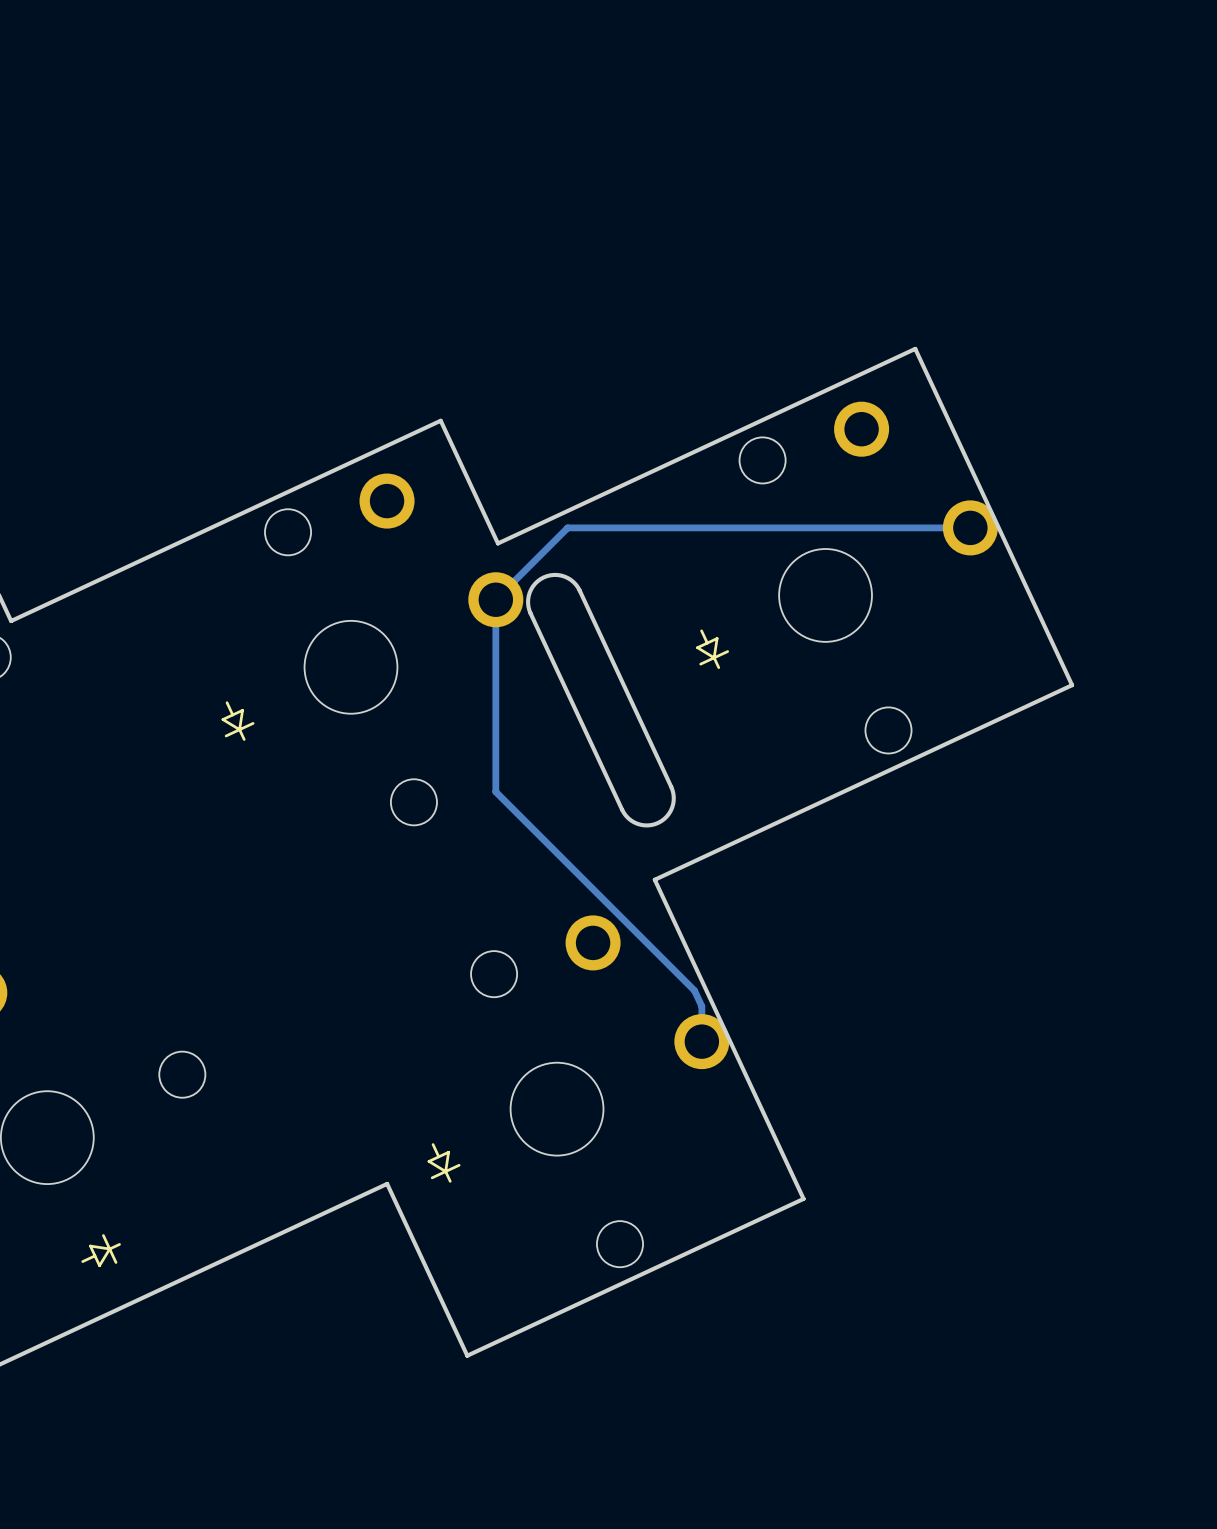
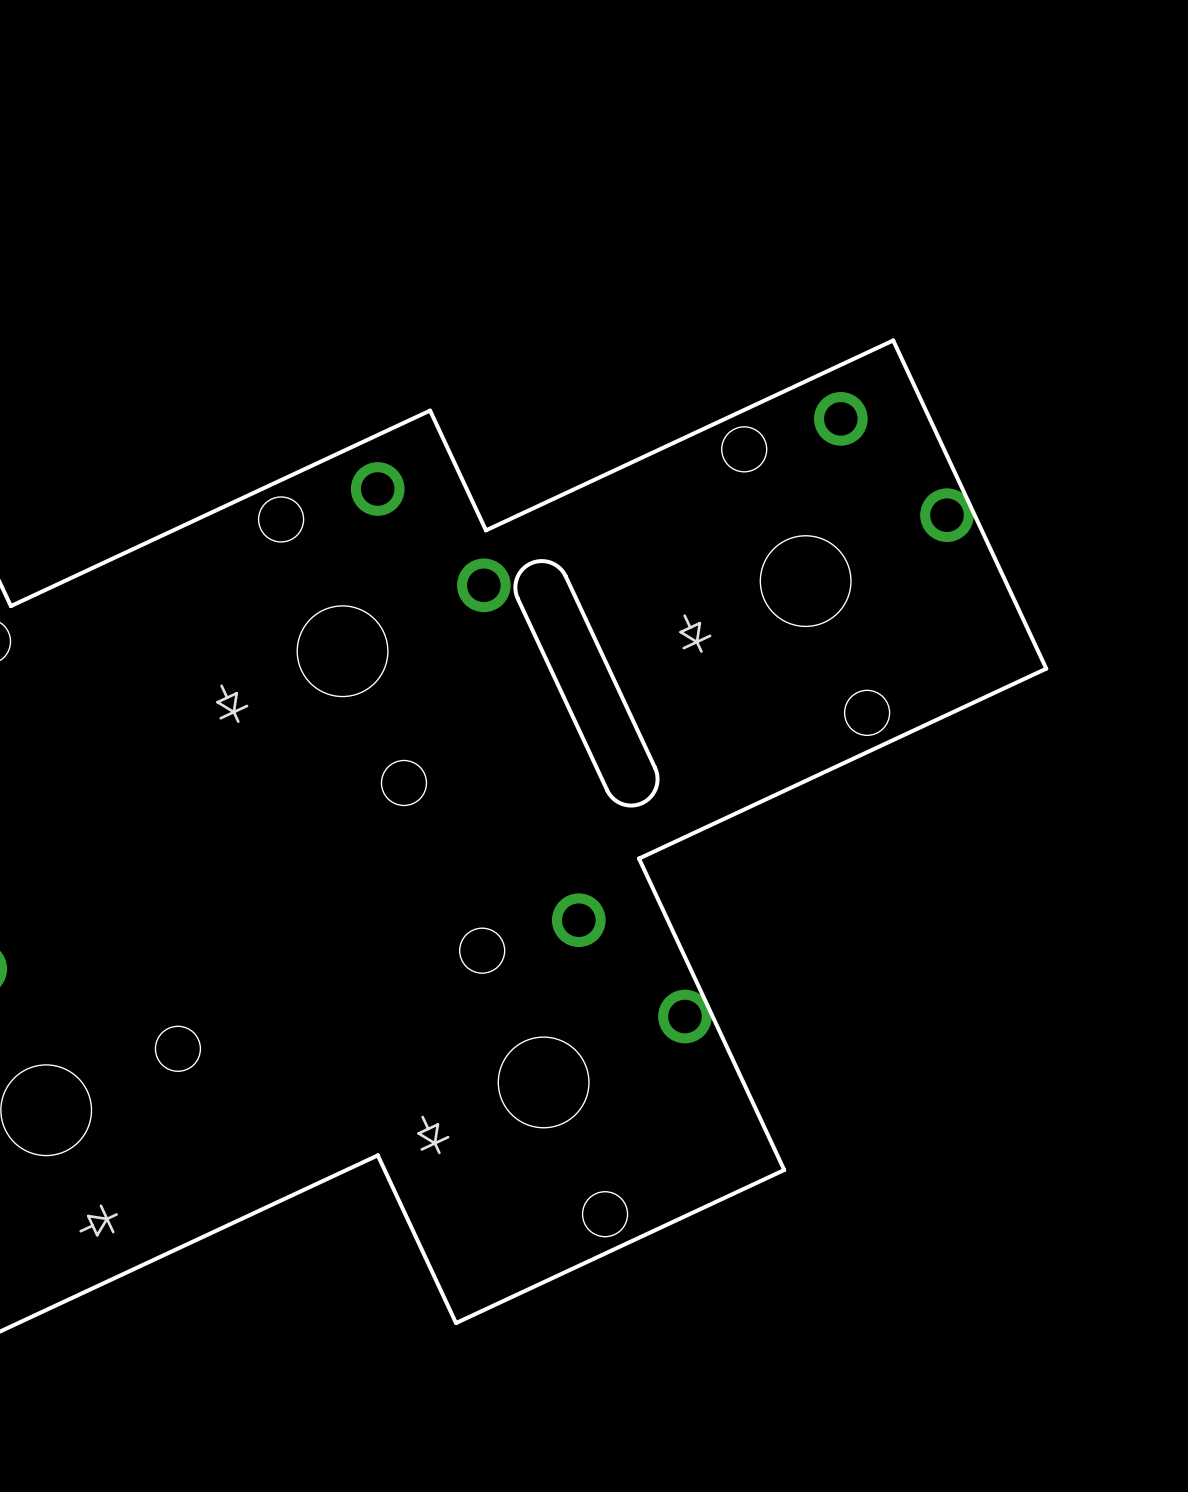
track: (970, 527) (567, 527) (495, 599) (495, 791) (694, 990) (701, 1006) (701, 1041) -> none

